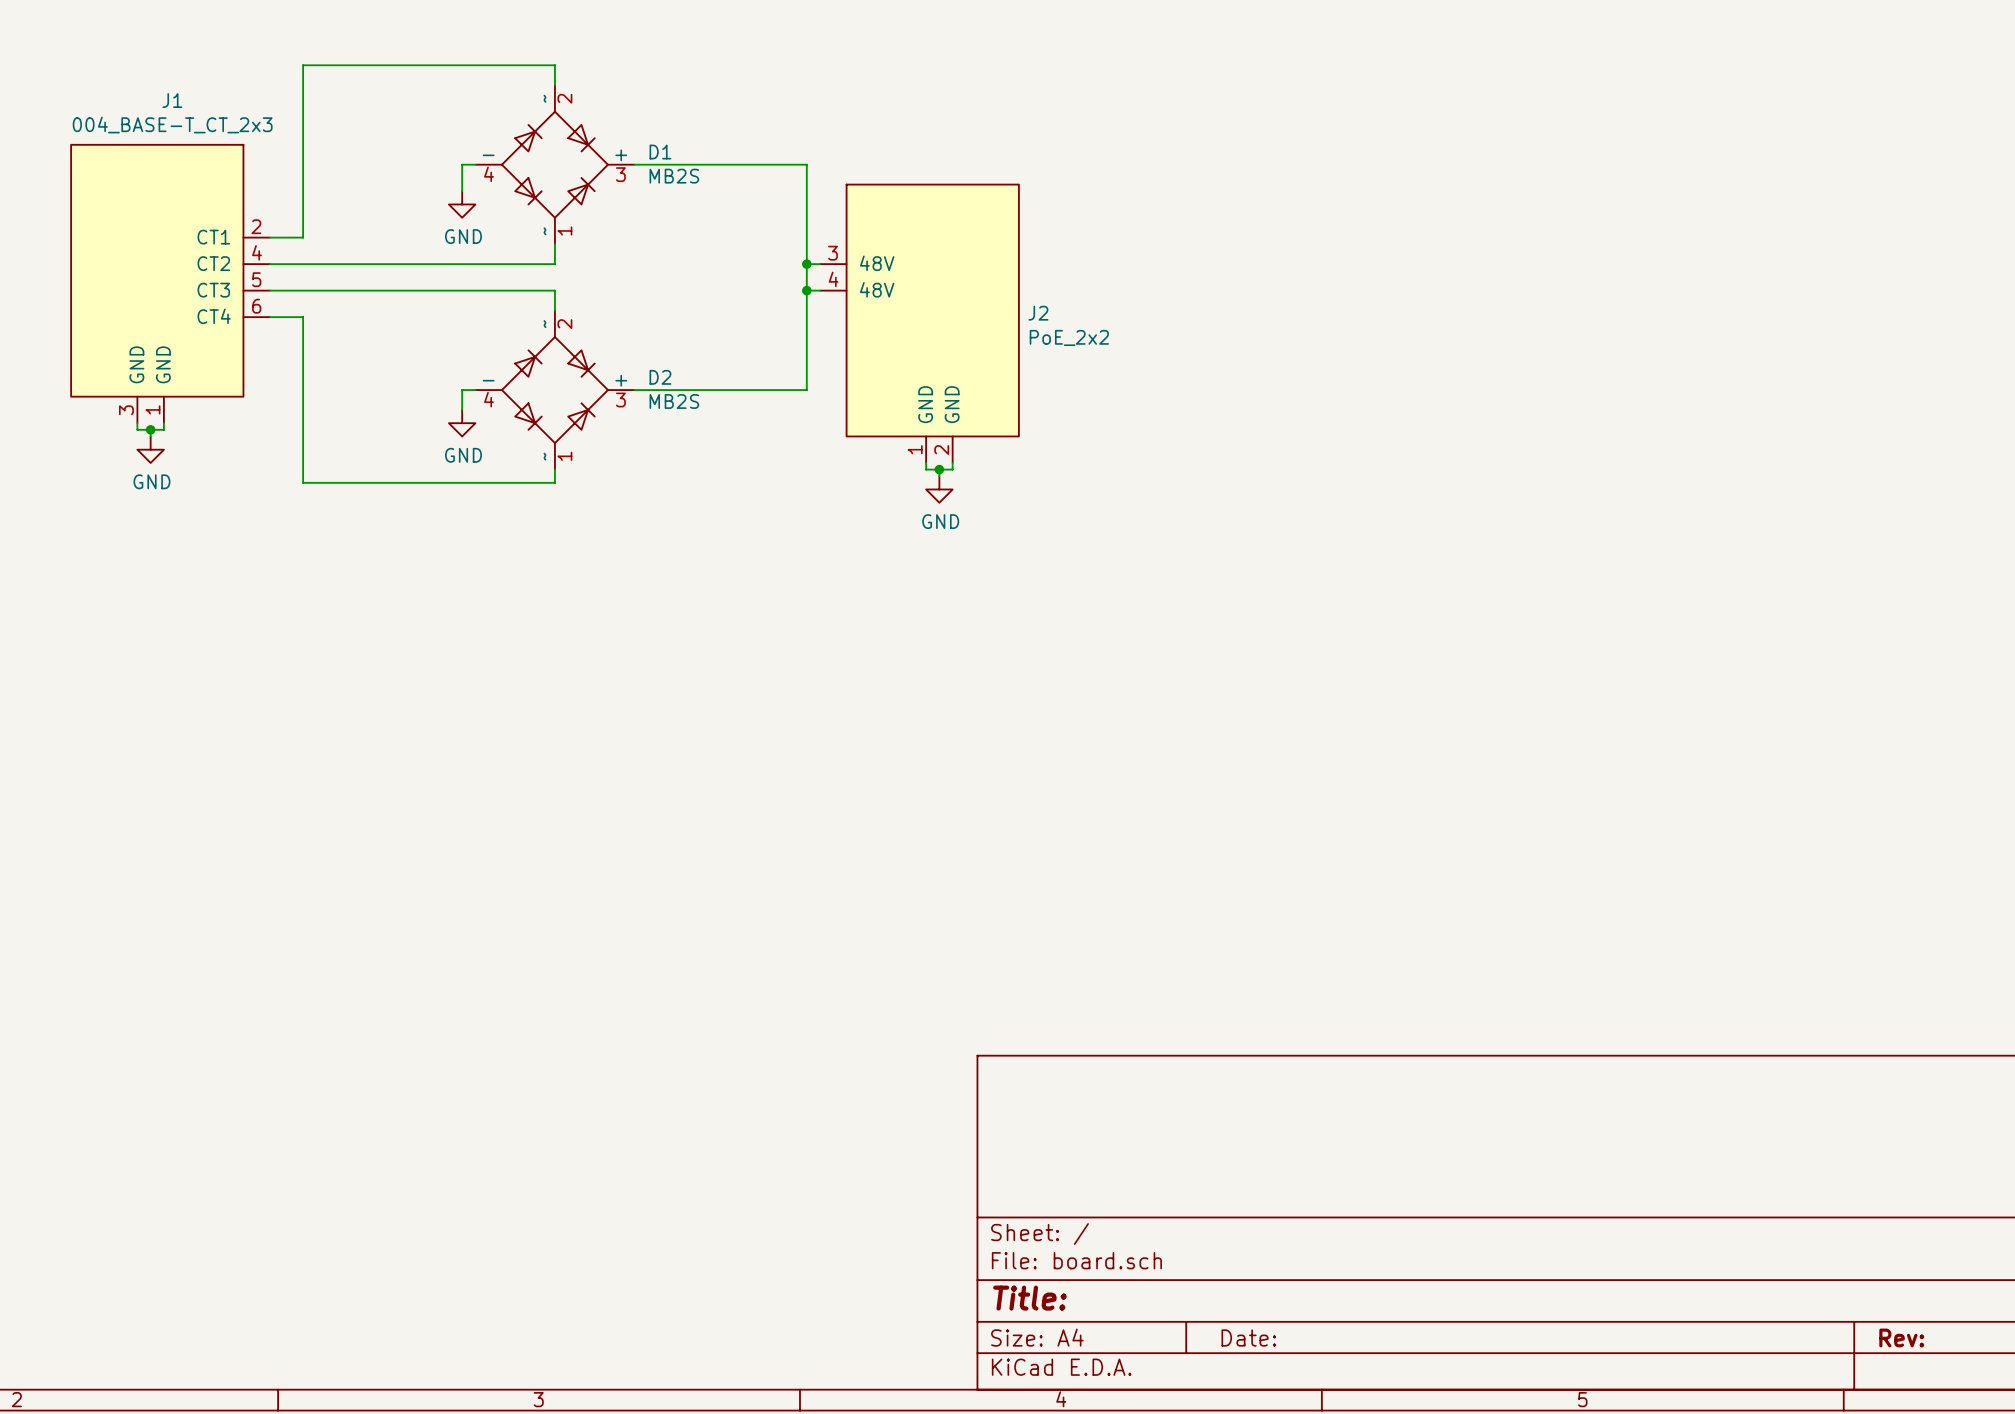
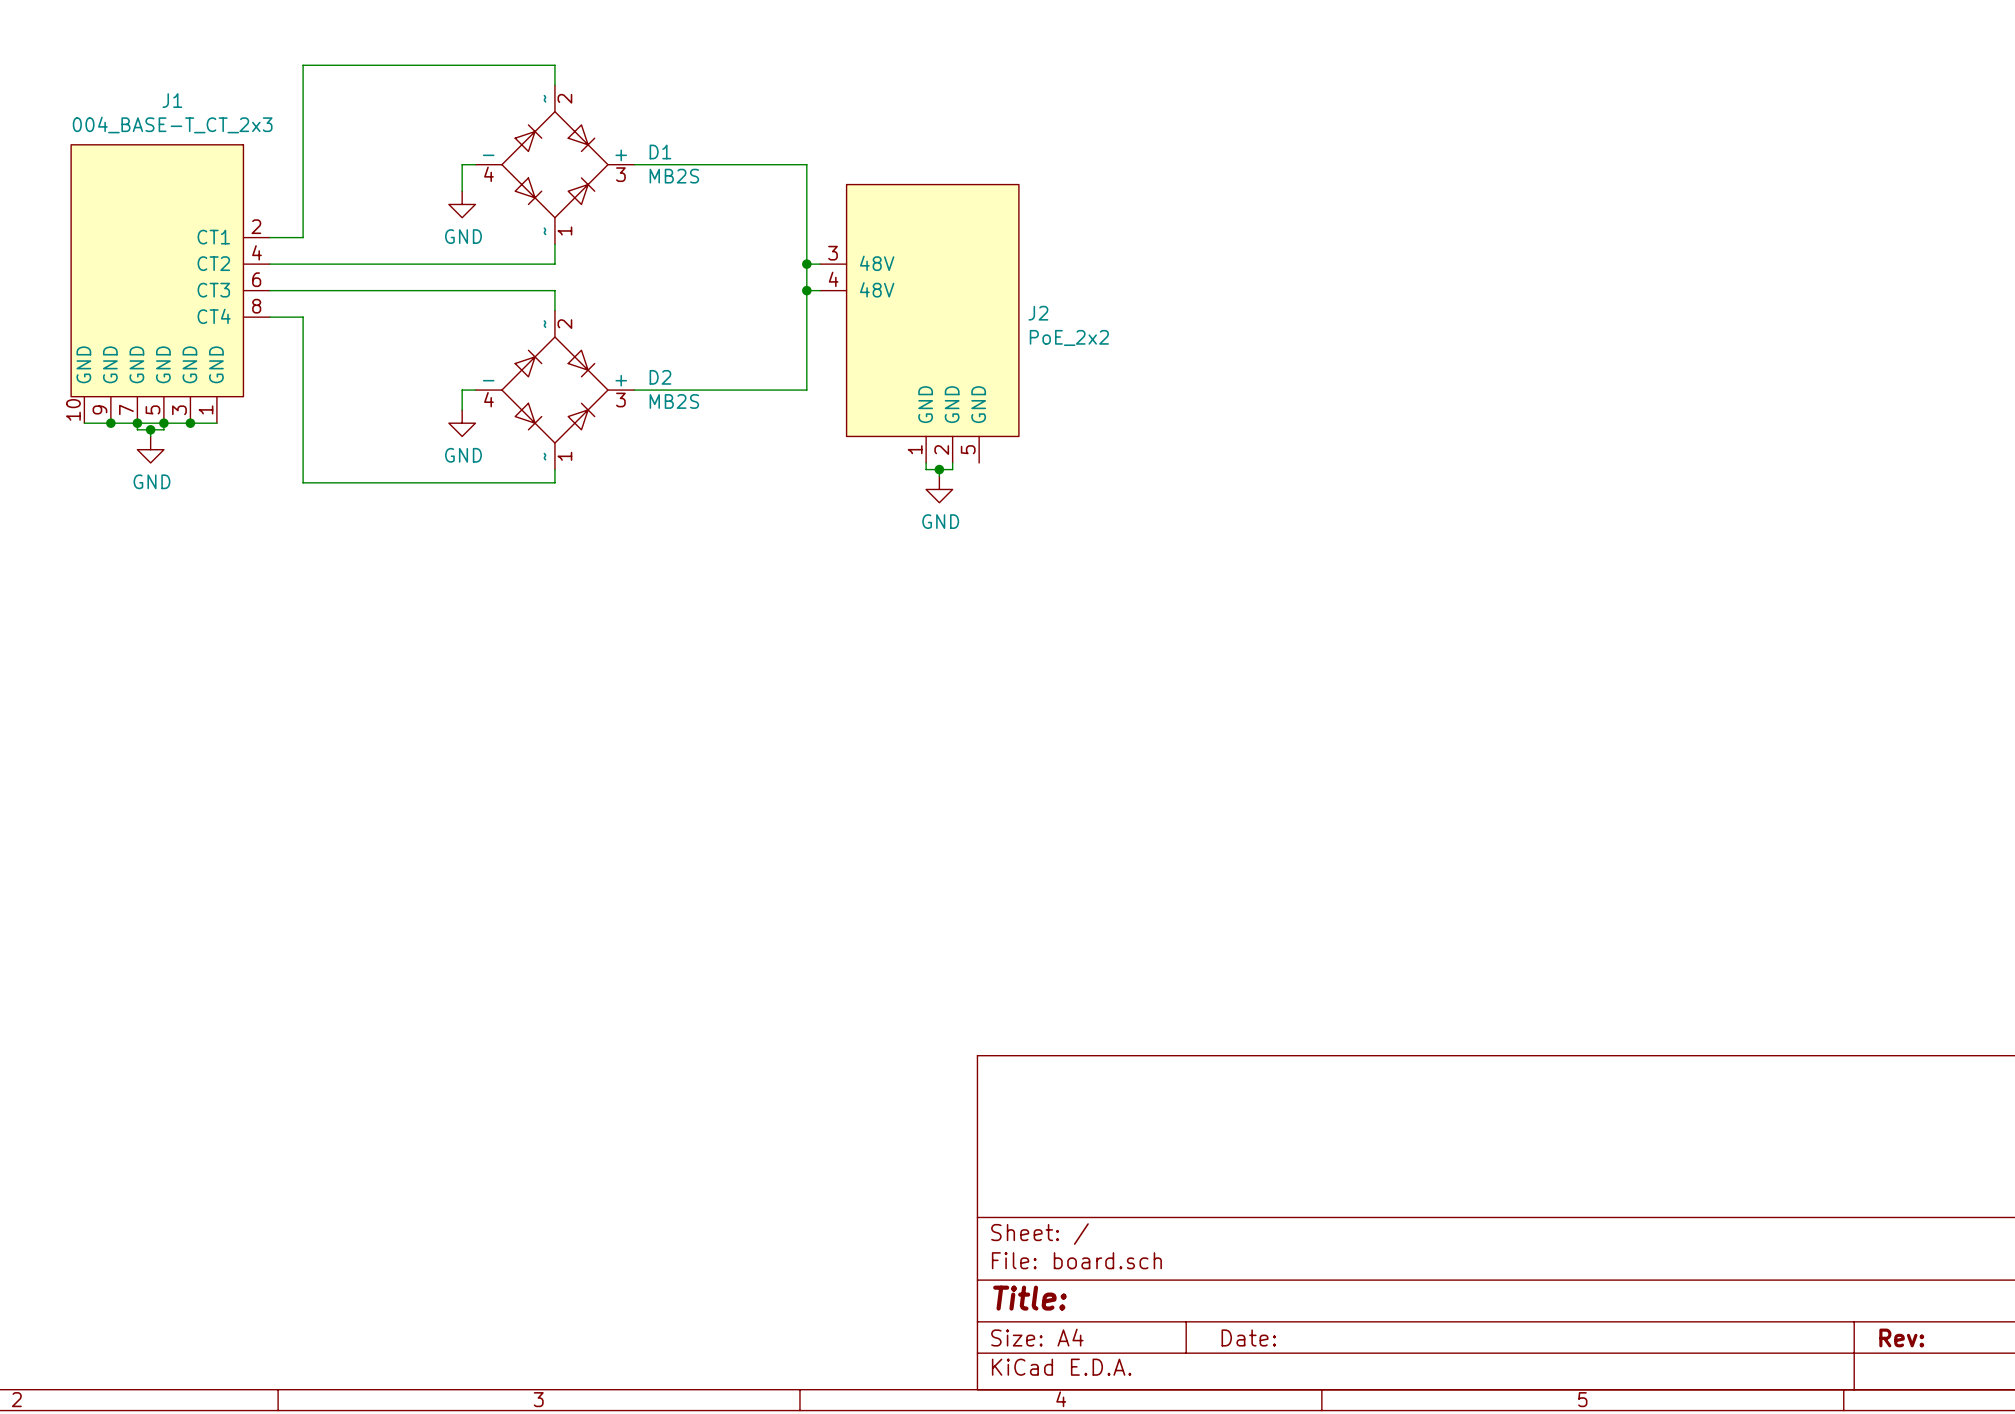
J1 symbol: [71, 144, 270, 424] -> [71, 144, 270, 424]
J2 symbol: [820, 184, 1019, 463] -> [820, 184, 1019, 463]
wire: none -> (84, 423) (216, 423)
junction: none -> (110, 423)
junction: none -> (137, 423)
junction: none -> (163, 423)
junction: none -> (190, 423)

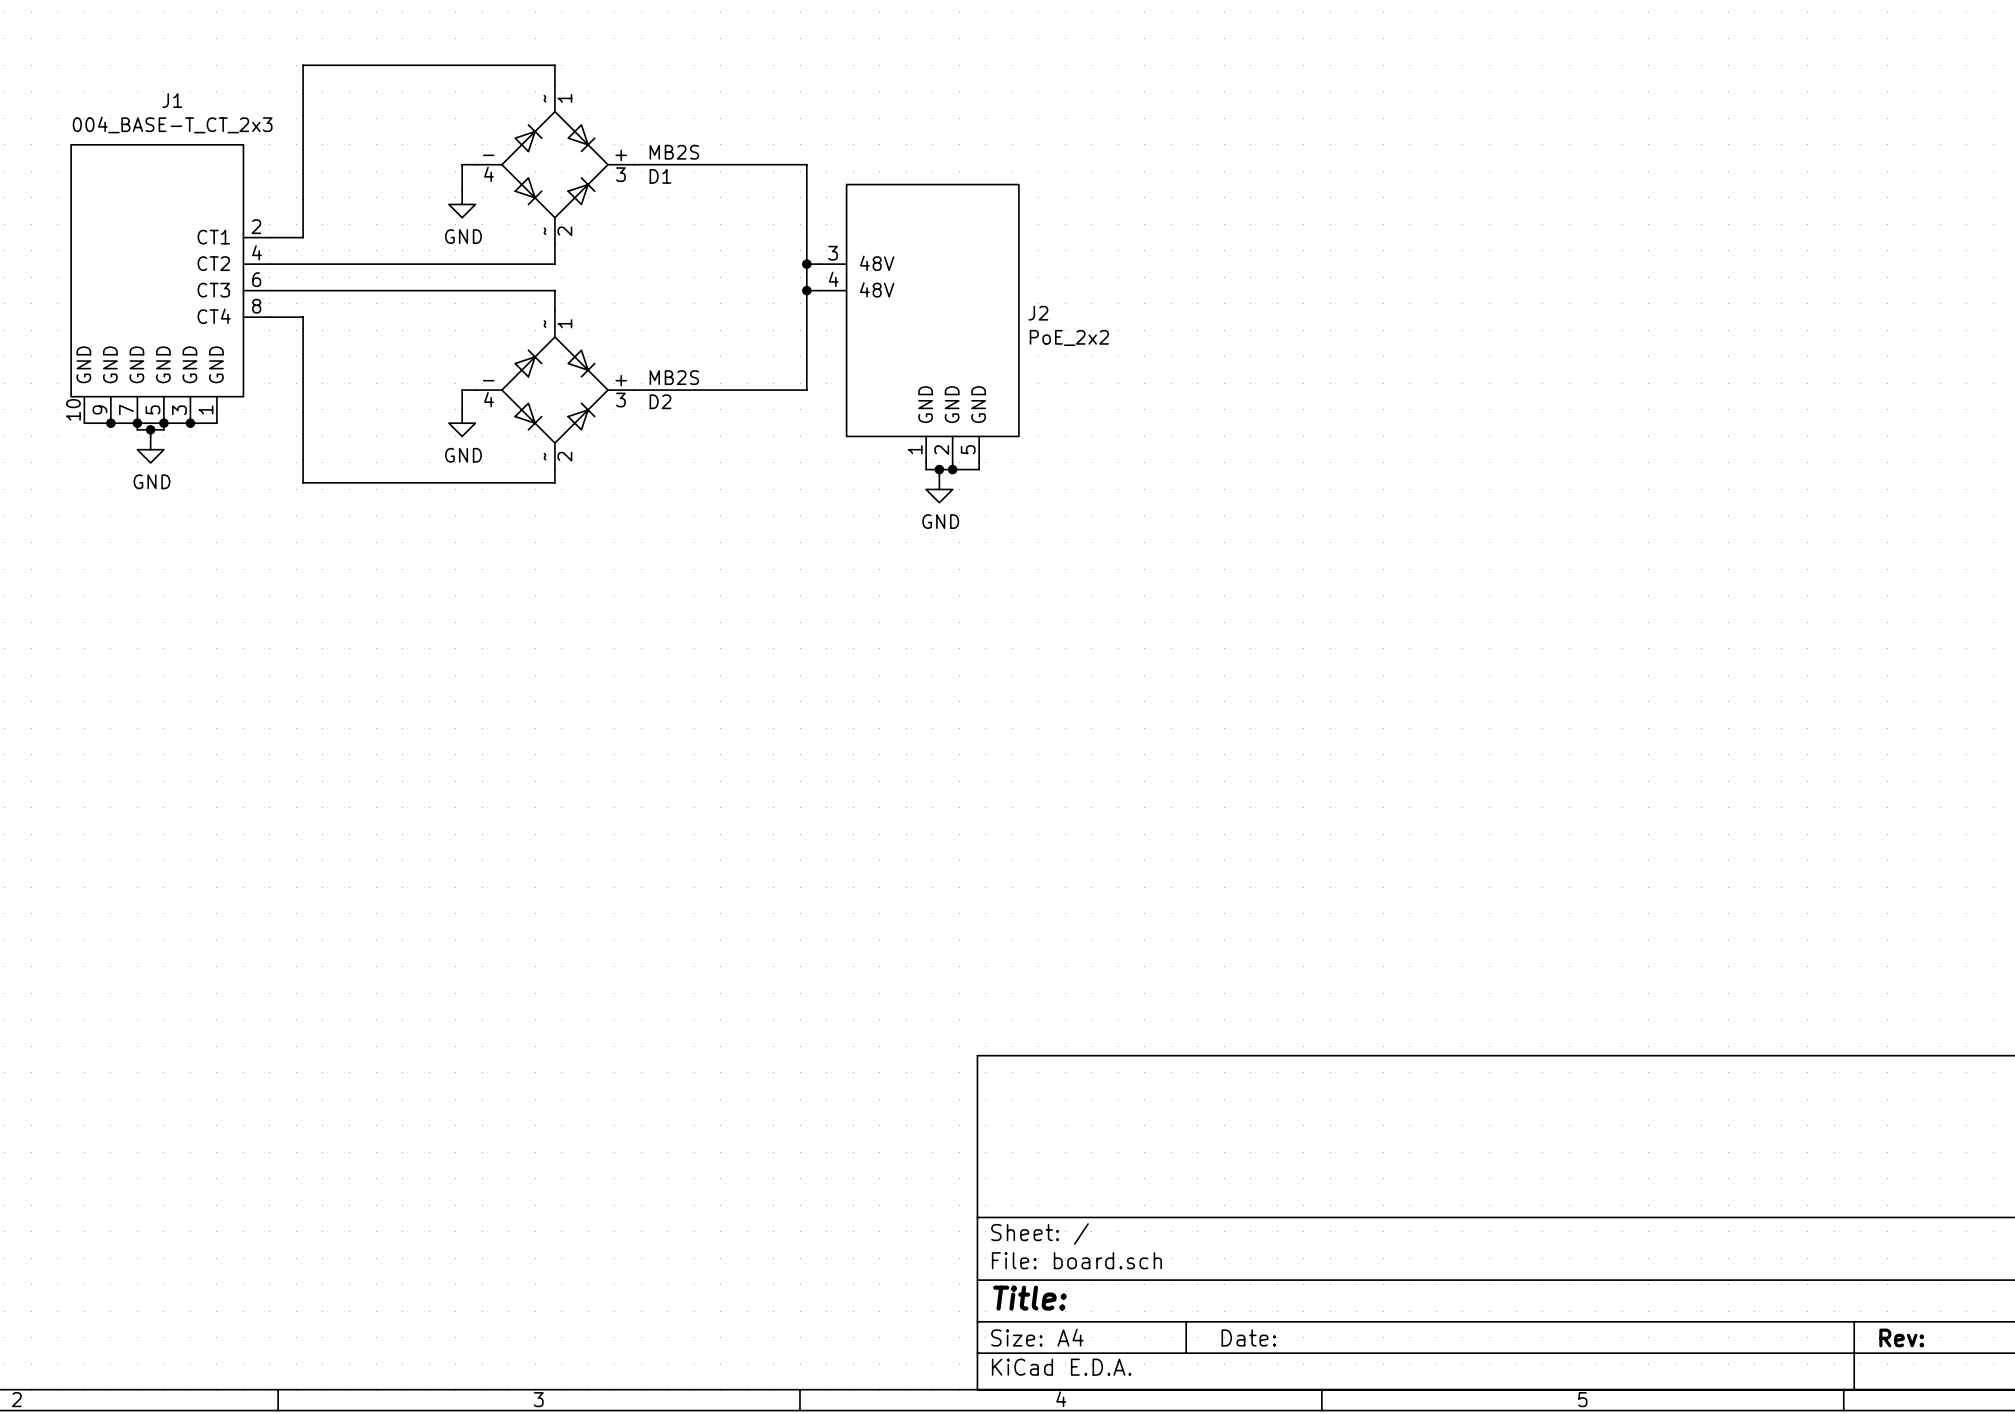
D1 flip: as is (554, 164) -> up-down (554, 164)
D2 flip: as is (554, 390) -> up-down (554, 390)
wire: none -> (979, 462) (979, 469) (952, 469)
junction: none -> (952, 469)

